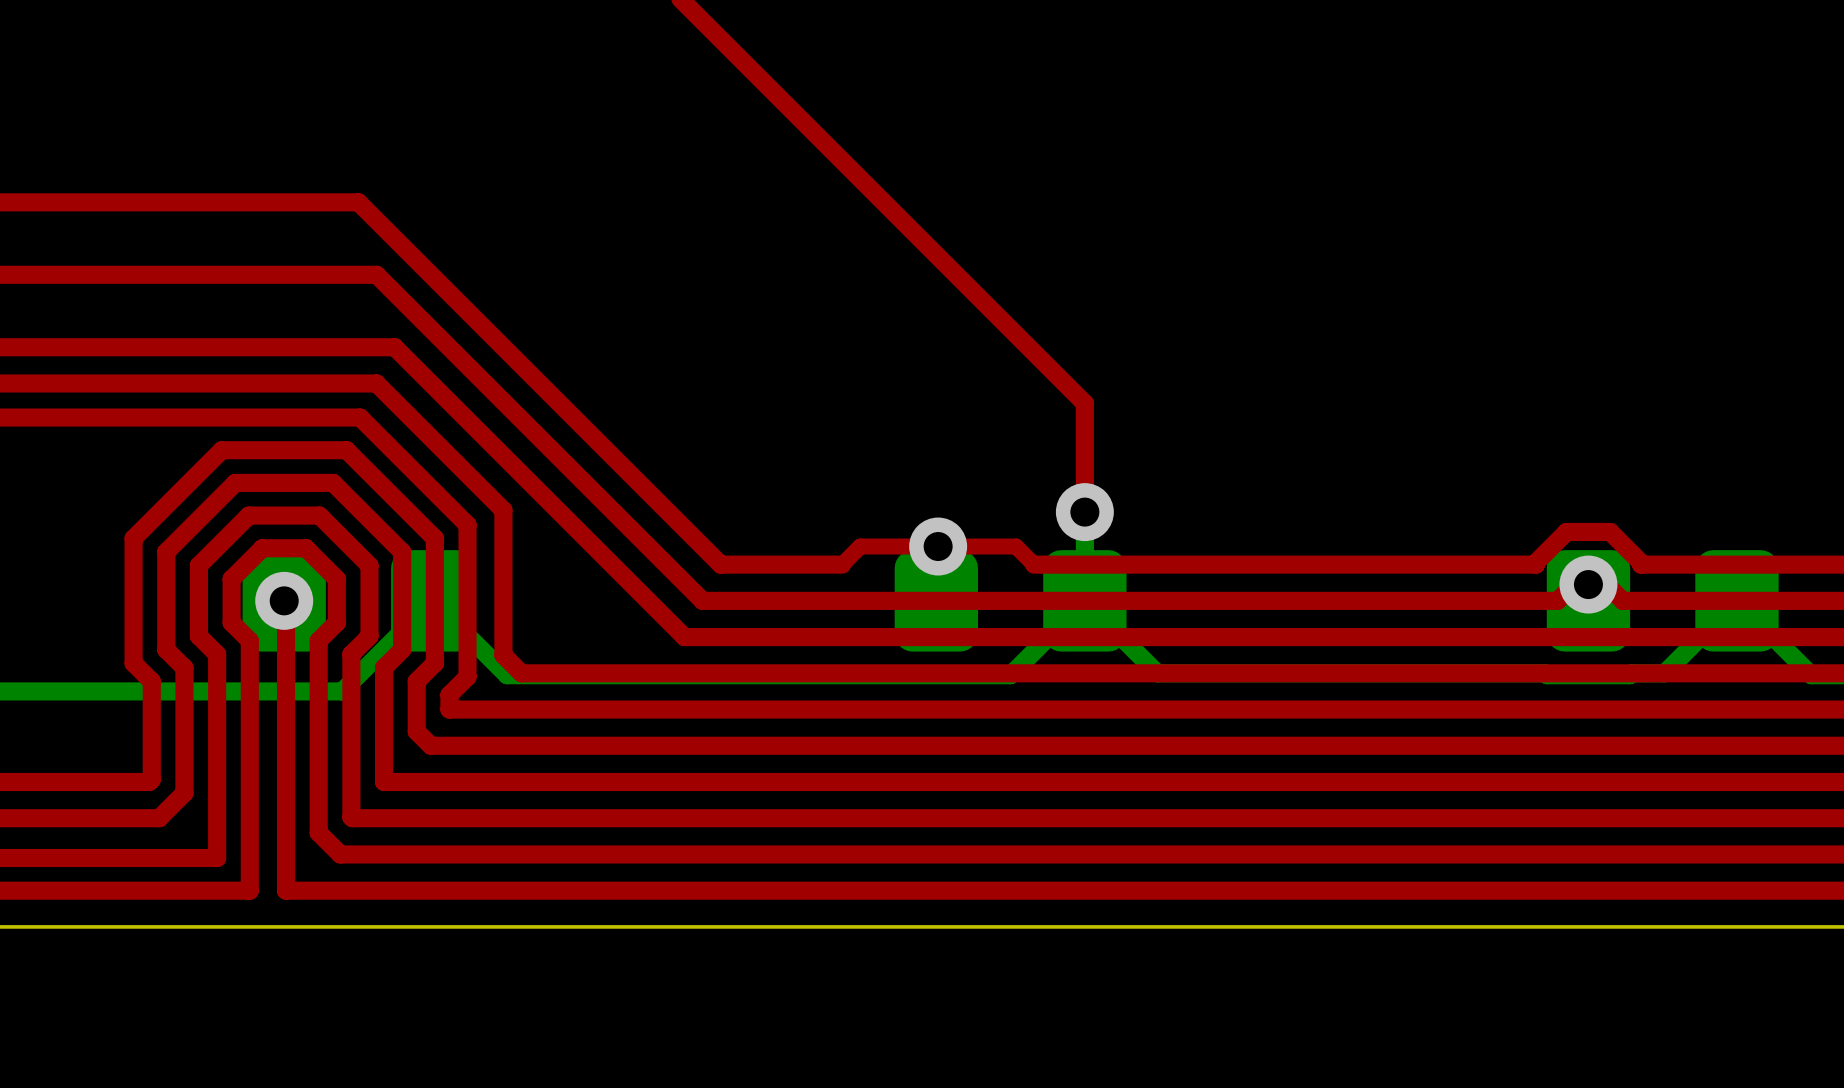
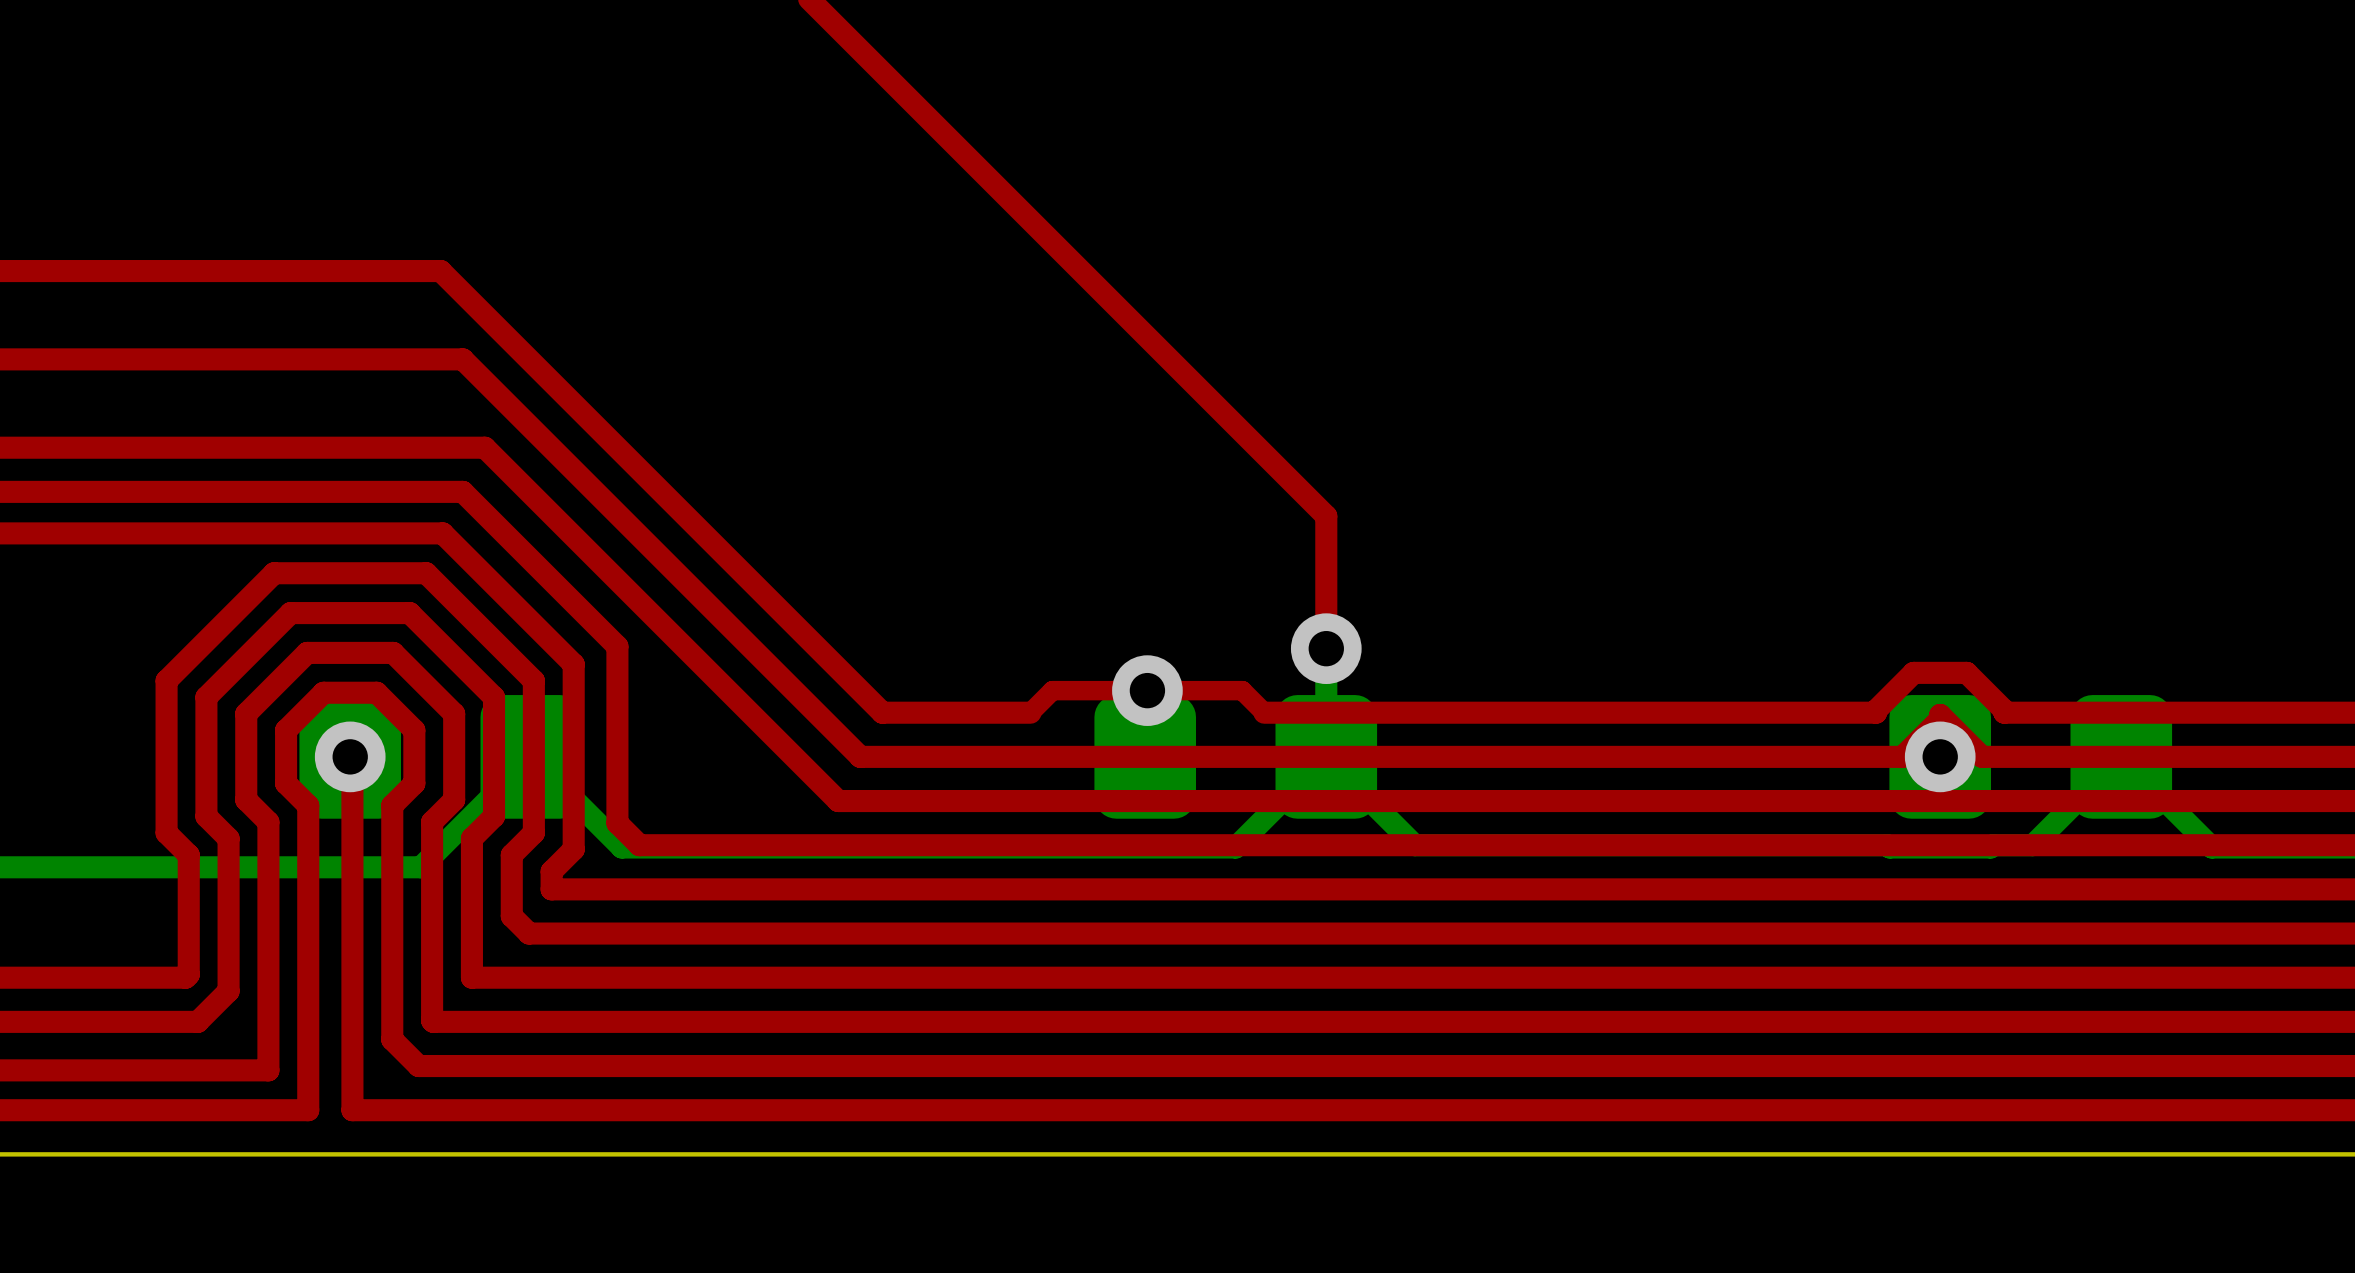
via position: (1588, 584) -> (1940, 756)

